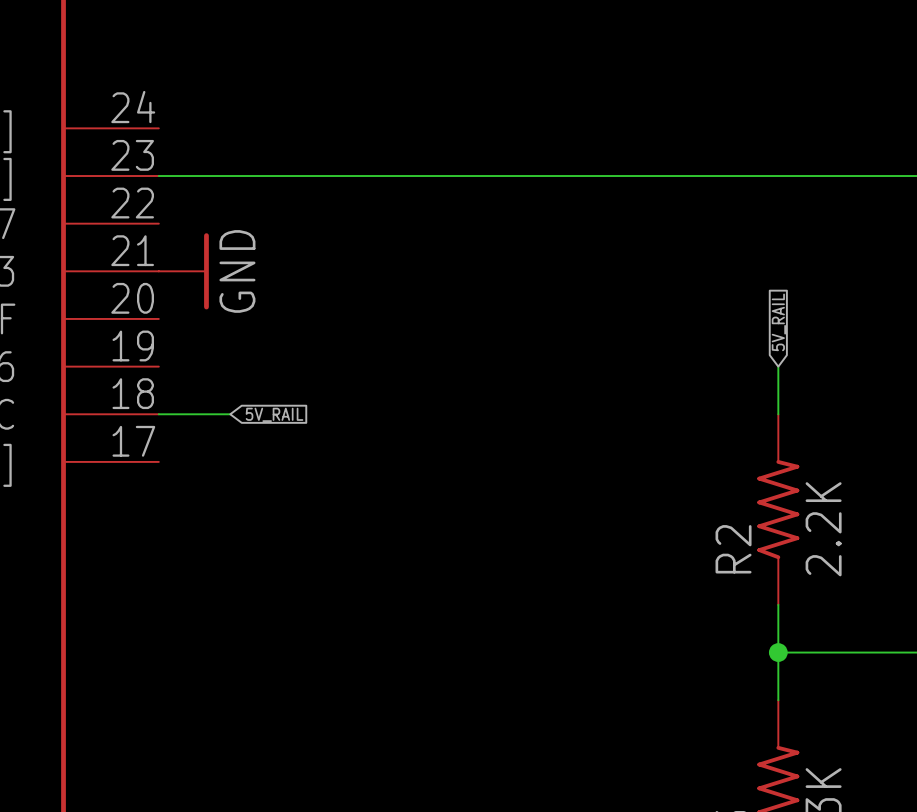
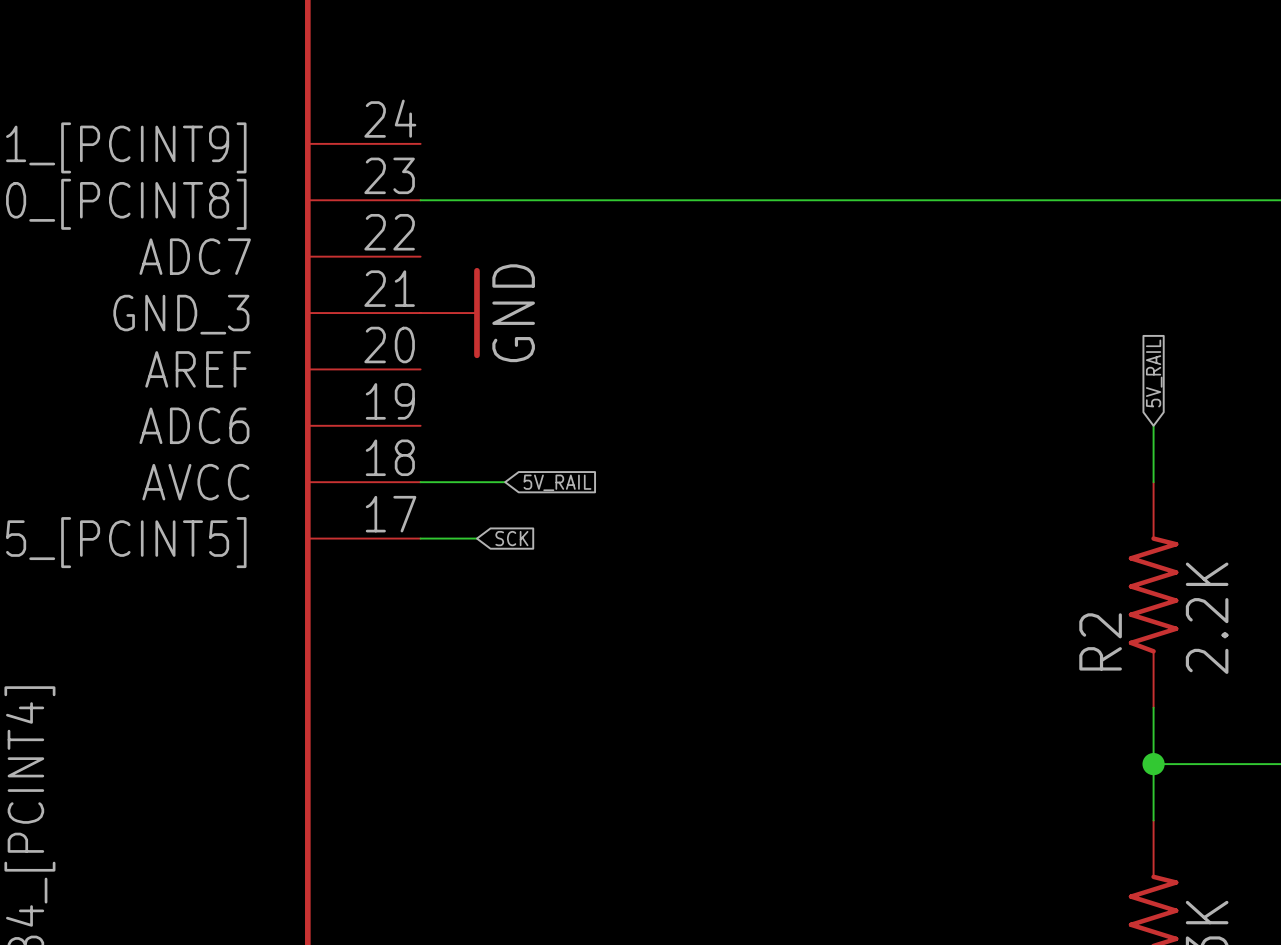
wire: none -> (420, 538) (476, 538)
global label: none -> SCK (511, 538)

